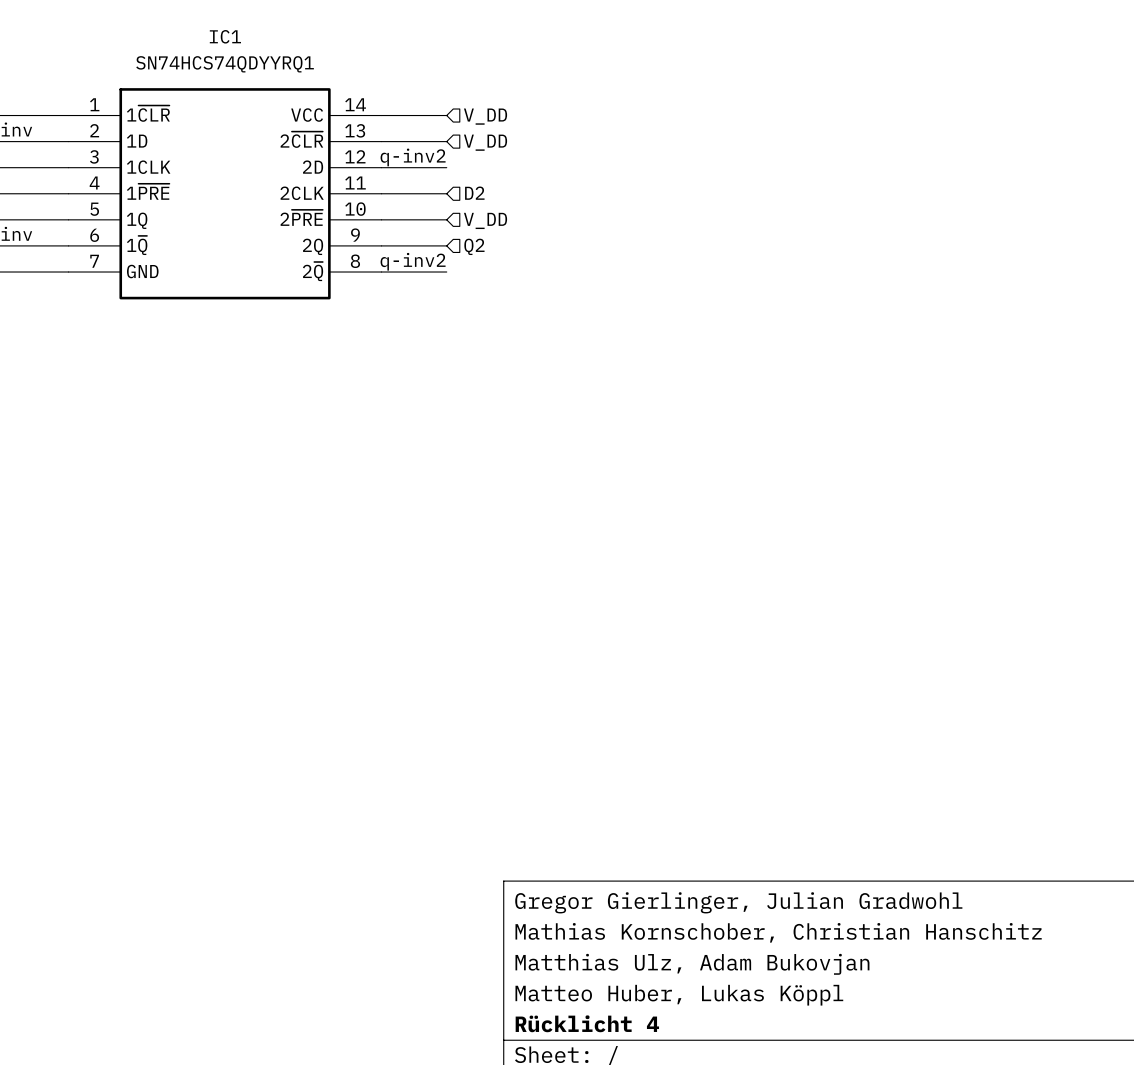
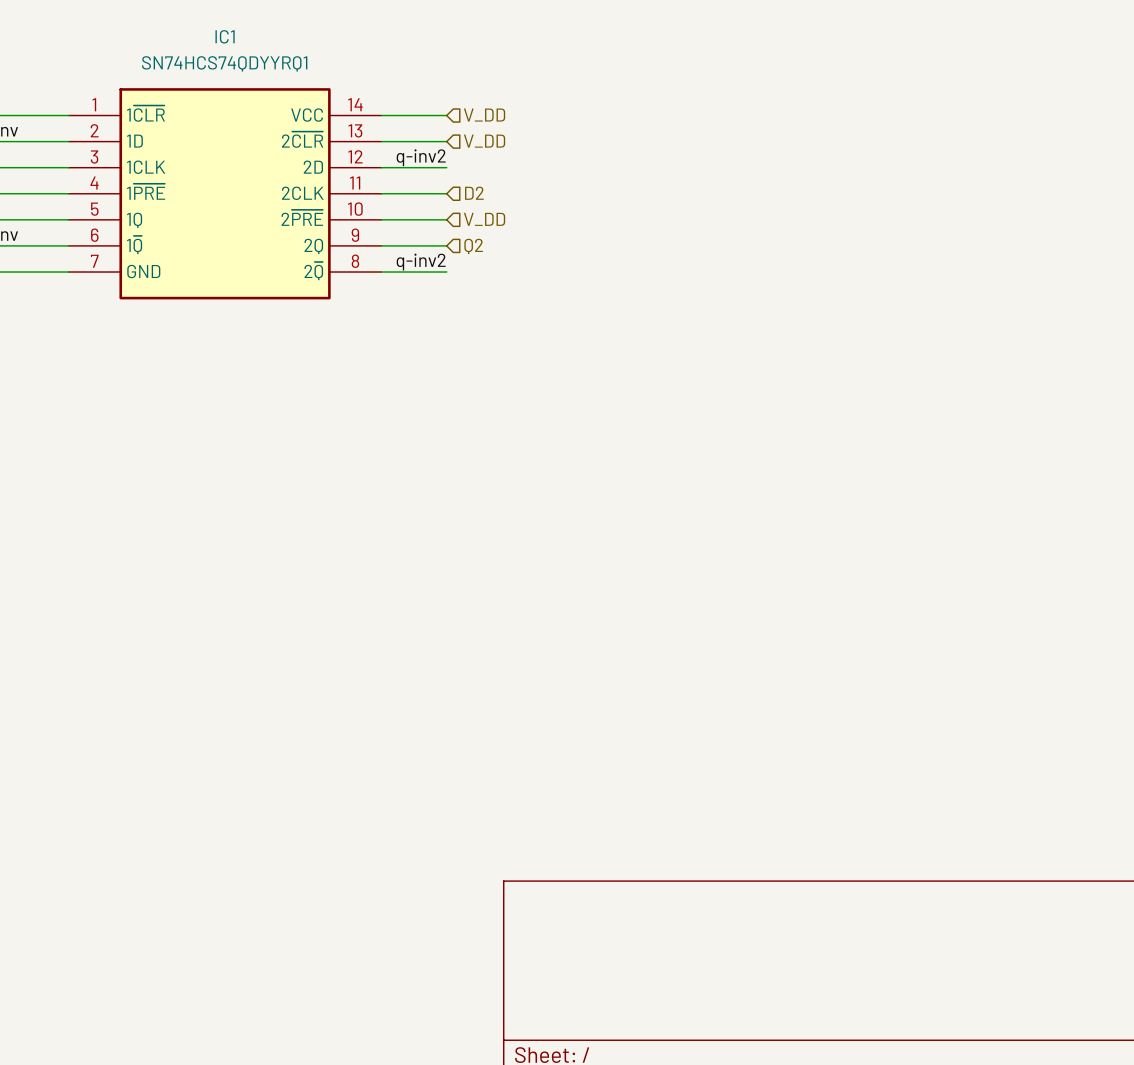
title block: Gregor Gierlinger, Julian Gradwohl (738, 902) -> none
title block: Mathias Kornschober, Christian Hanschitz (778, 932) -> none
title block: Matthias Ulz, Adam Bukovjan (692, 964) -> none
title block: Matteo Huber, Lukas Köppl (679, 995) -> none
title block: Rücklicht 4 (587, 1023) -> none

